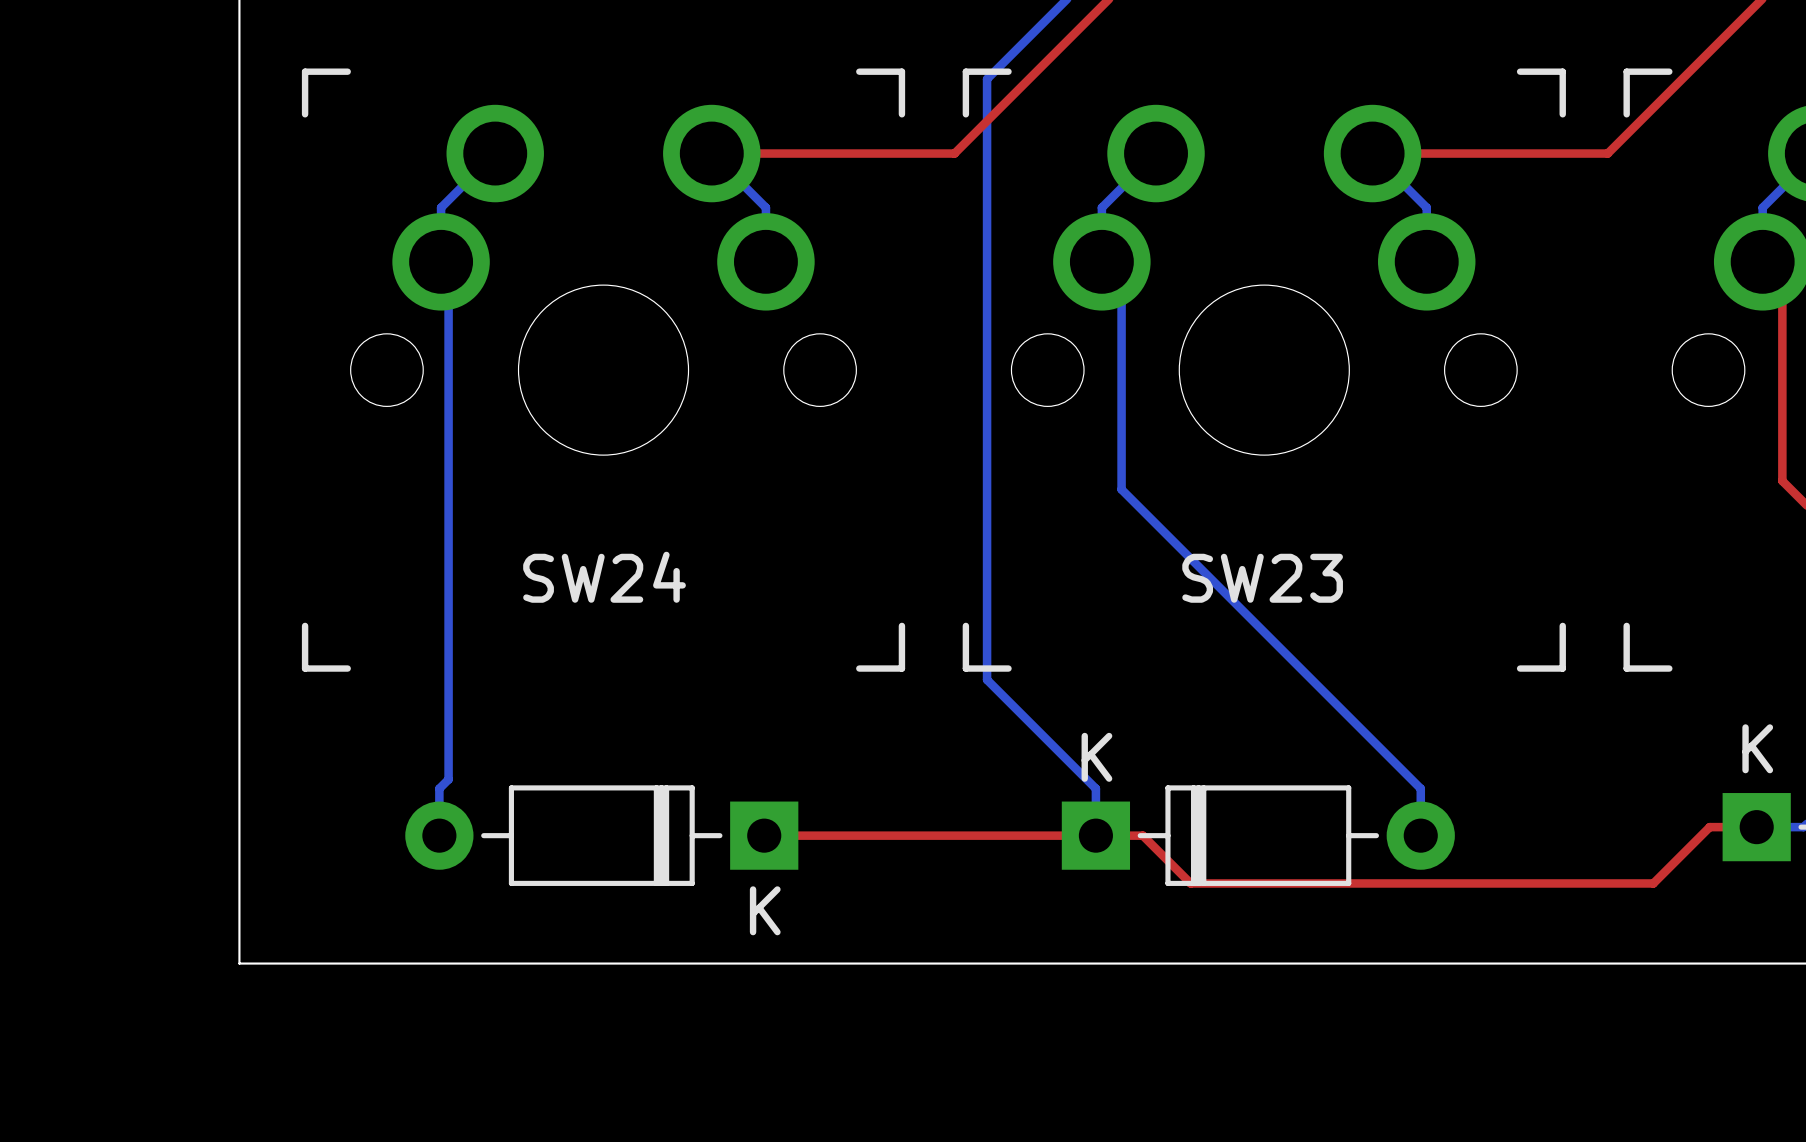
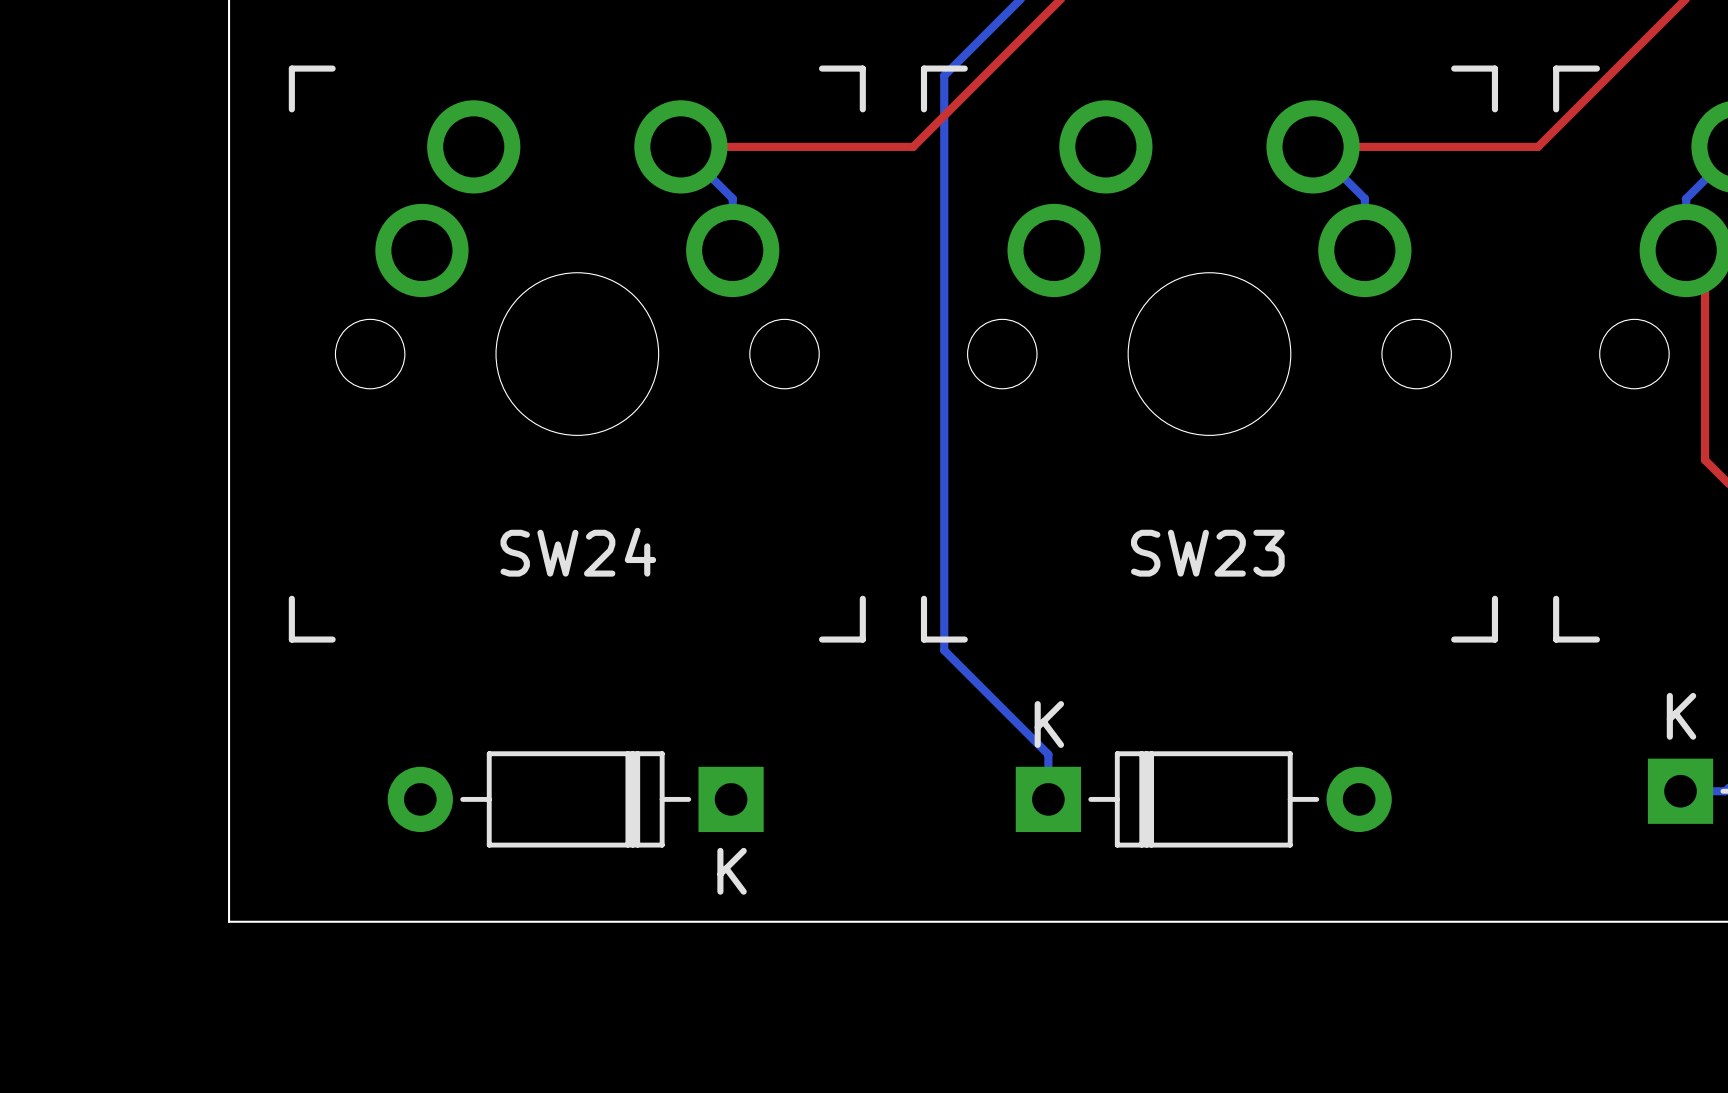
bottom track: (495, 153) (441, 207) (441, 261) (448, 269) (448, 779) (439, 788) (439, 835) -> none
bottom track: (1156, 153) (1101, 207) (1101, 261) (1121, 281) (1121, 489) (1420, 788) (1420, 835) -> none
top track: (1756, 827) (1709, 827) (1653, 883) (1190, 883) (1142, 835) (764, 835) -> none

